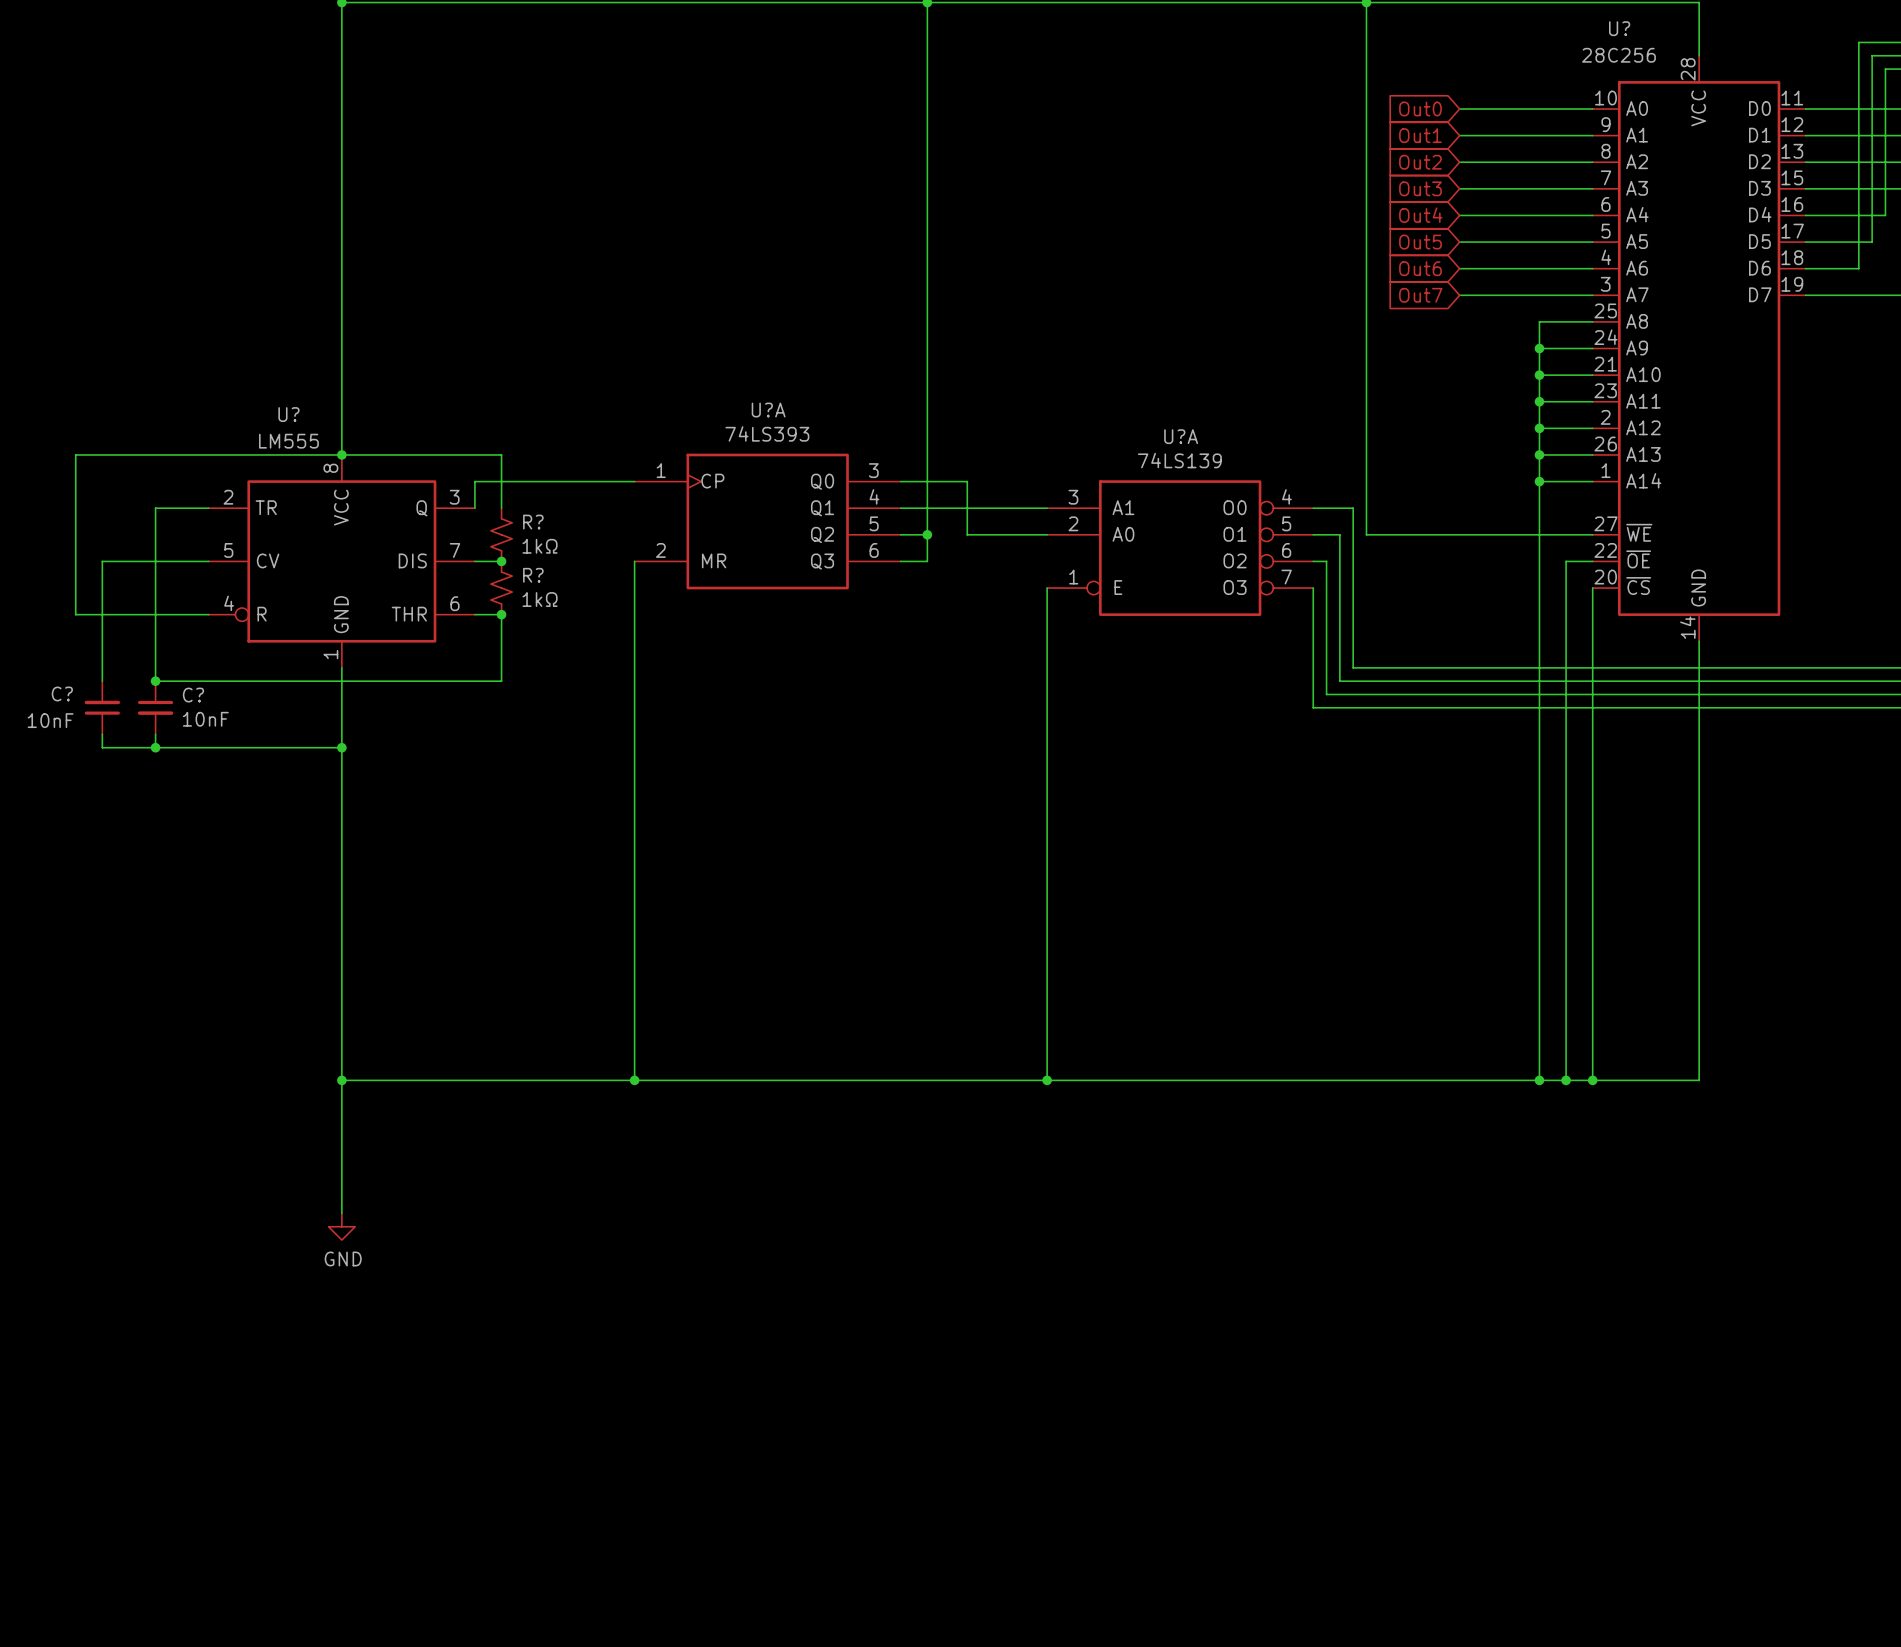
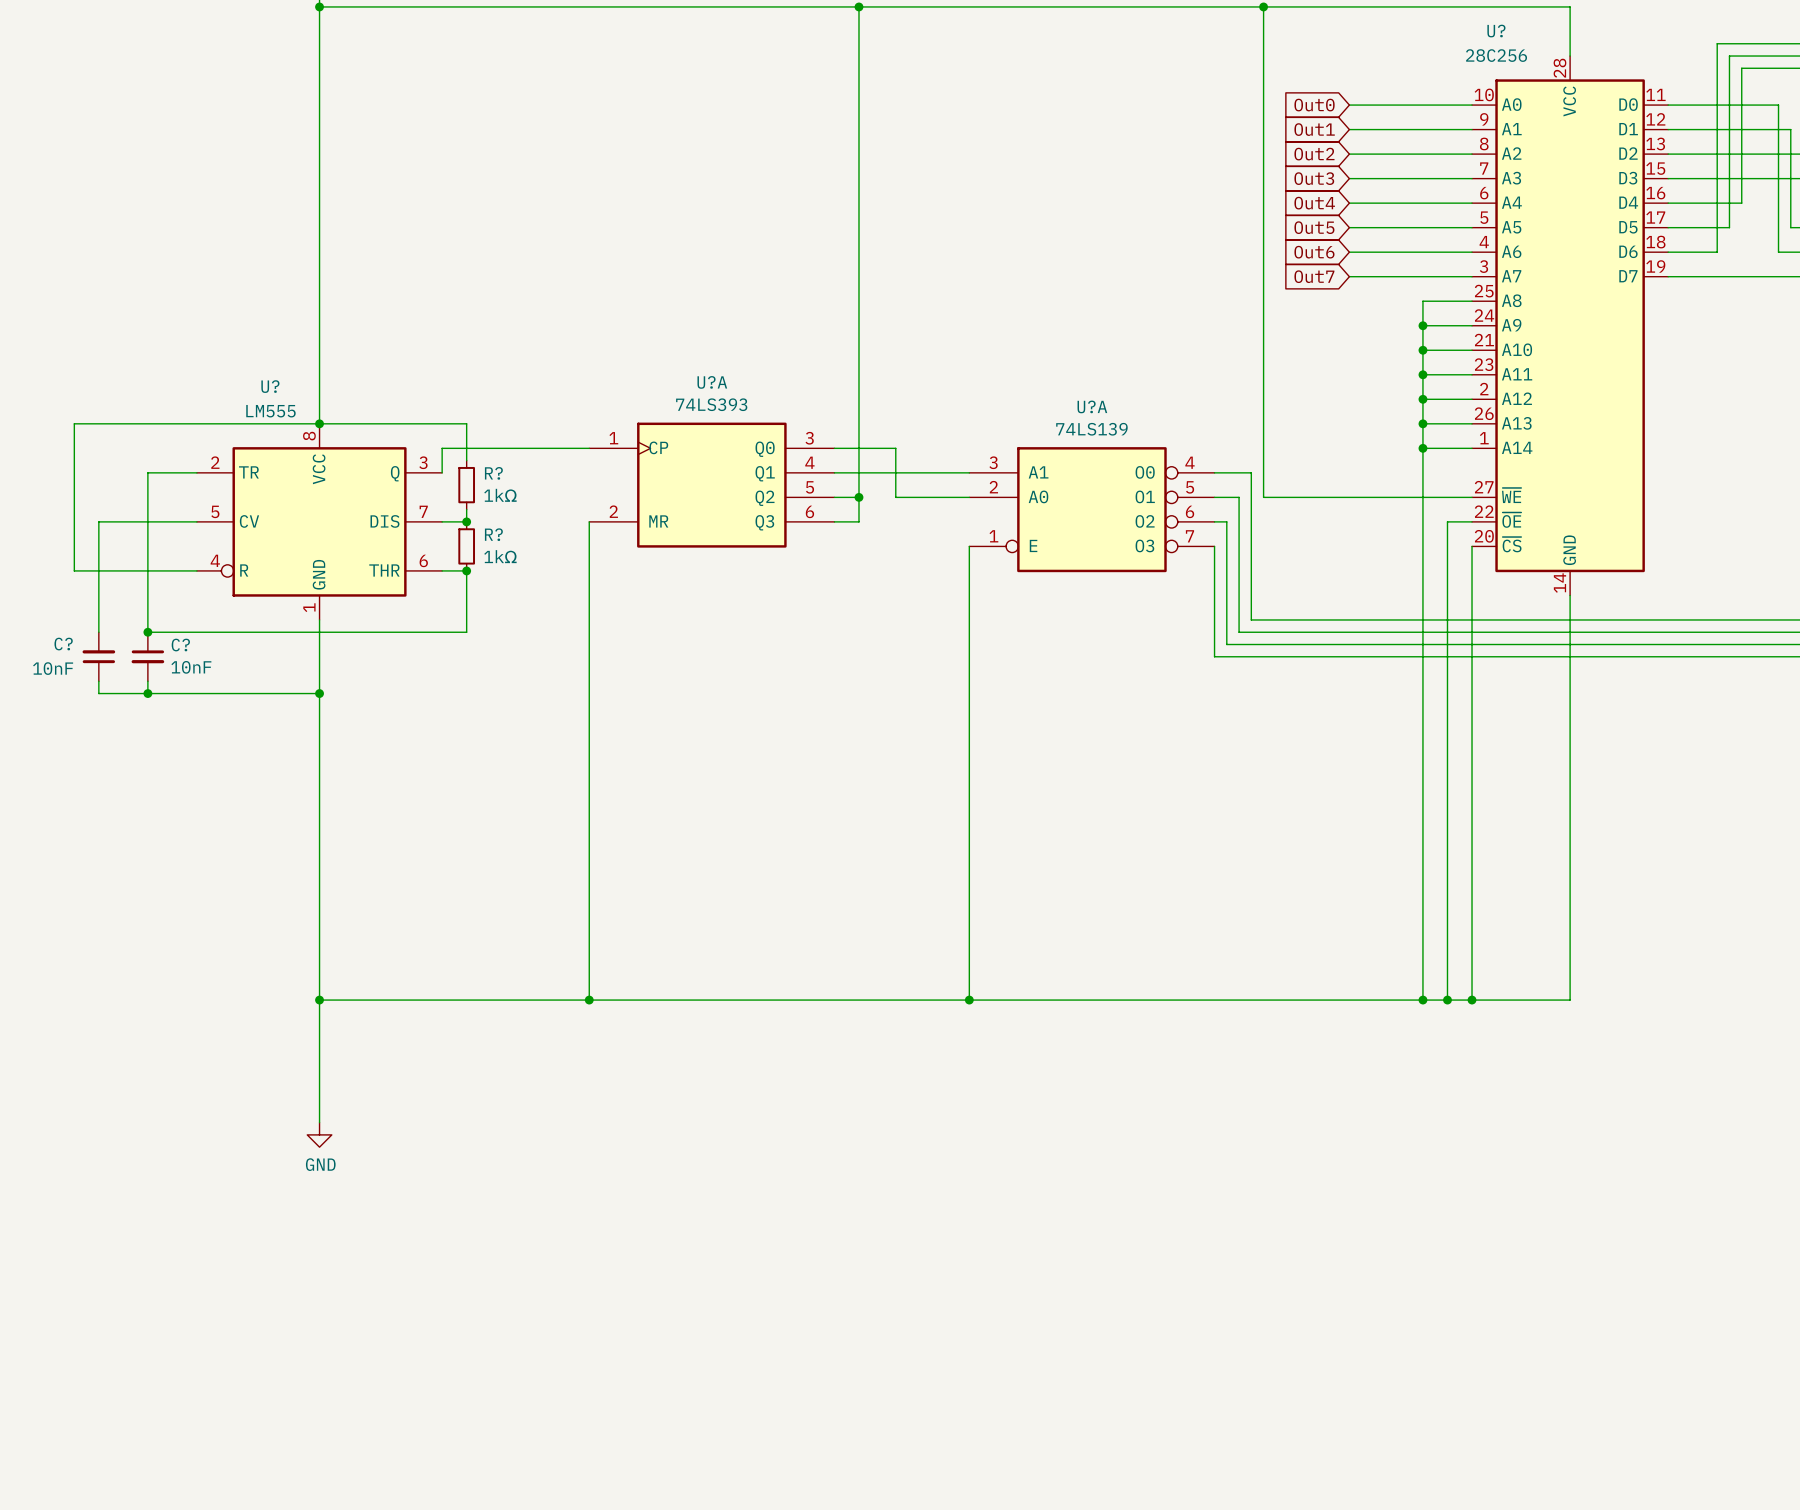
R?: none -> 1kΩ (466, 485)
R?: 1kΩ (501, 534) -> none
R? symbol: [490, 561, 513, 615] -> [458, 521, 476, 571]

